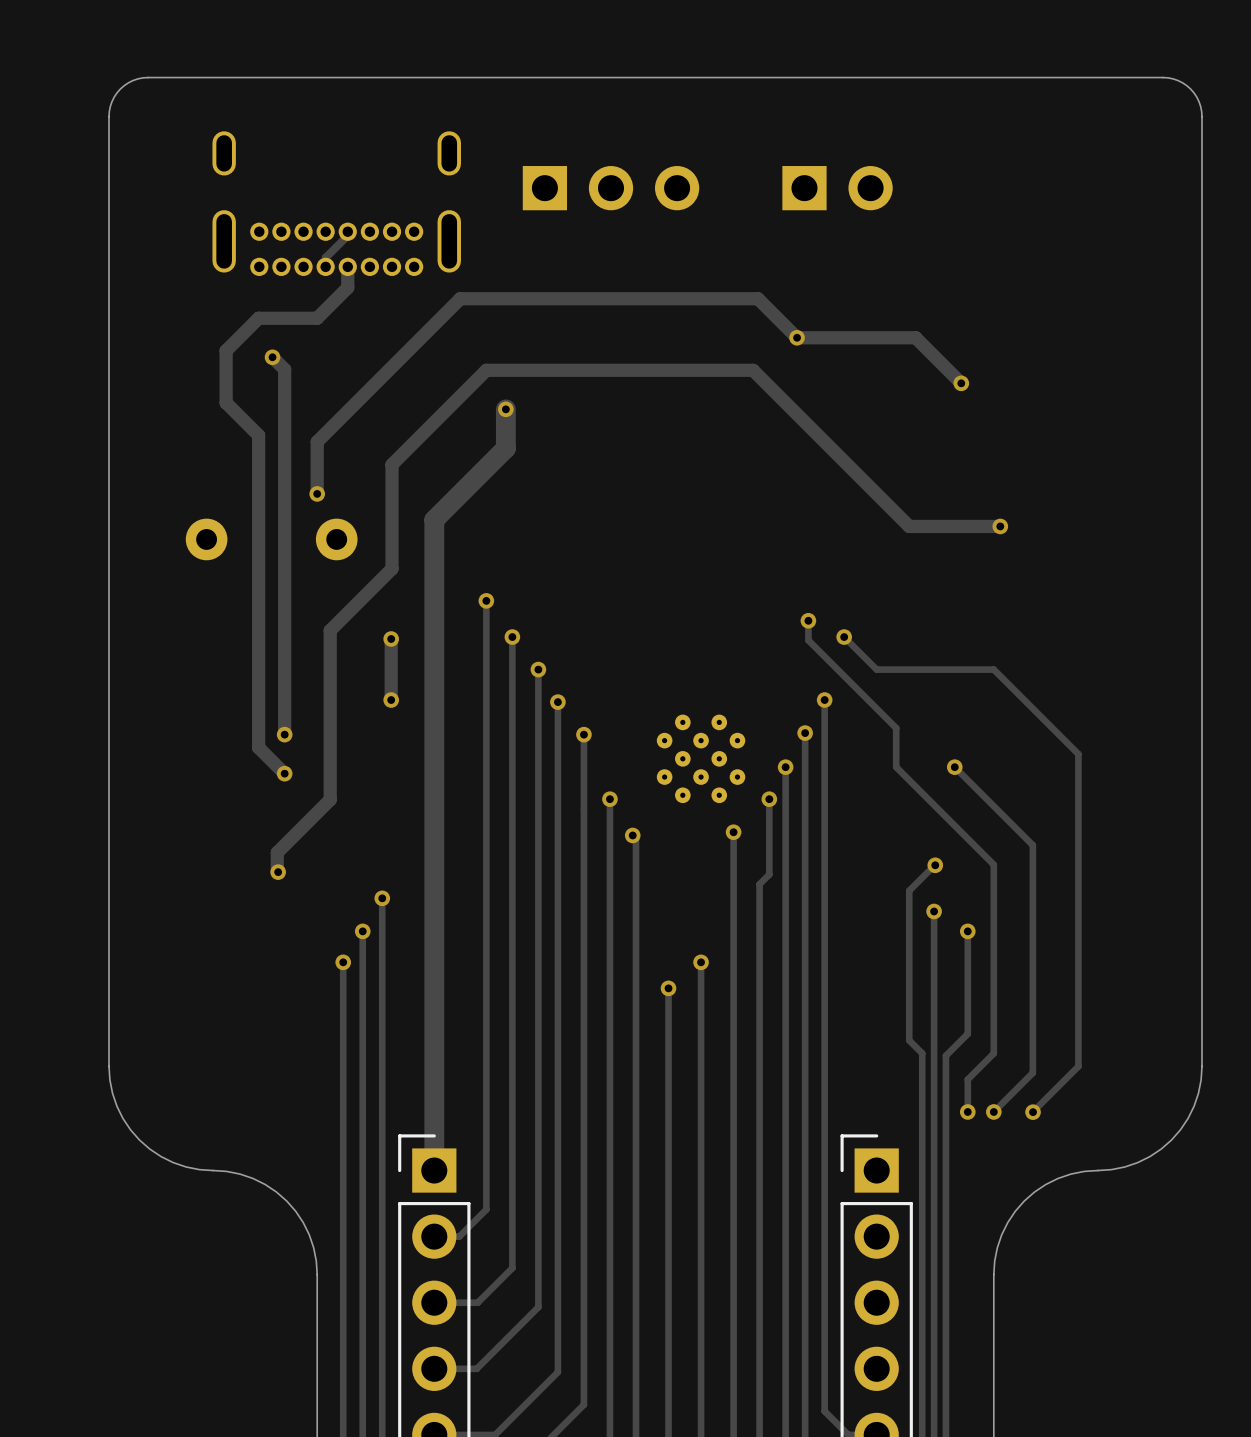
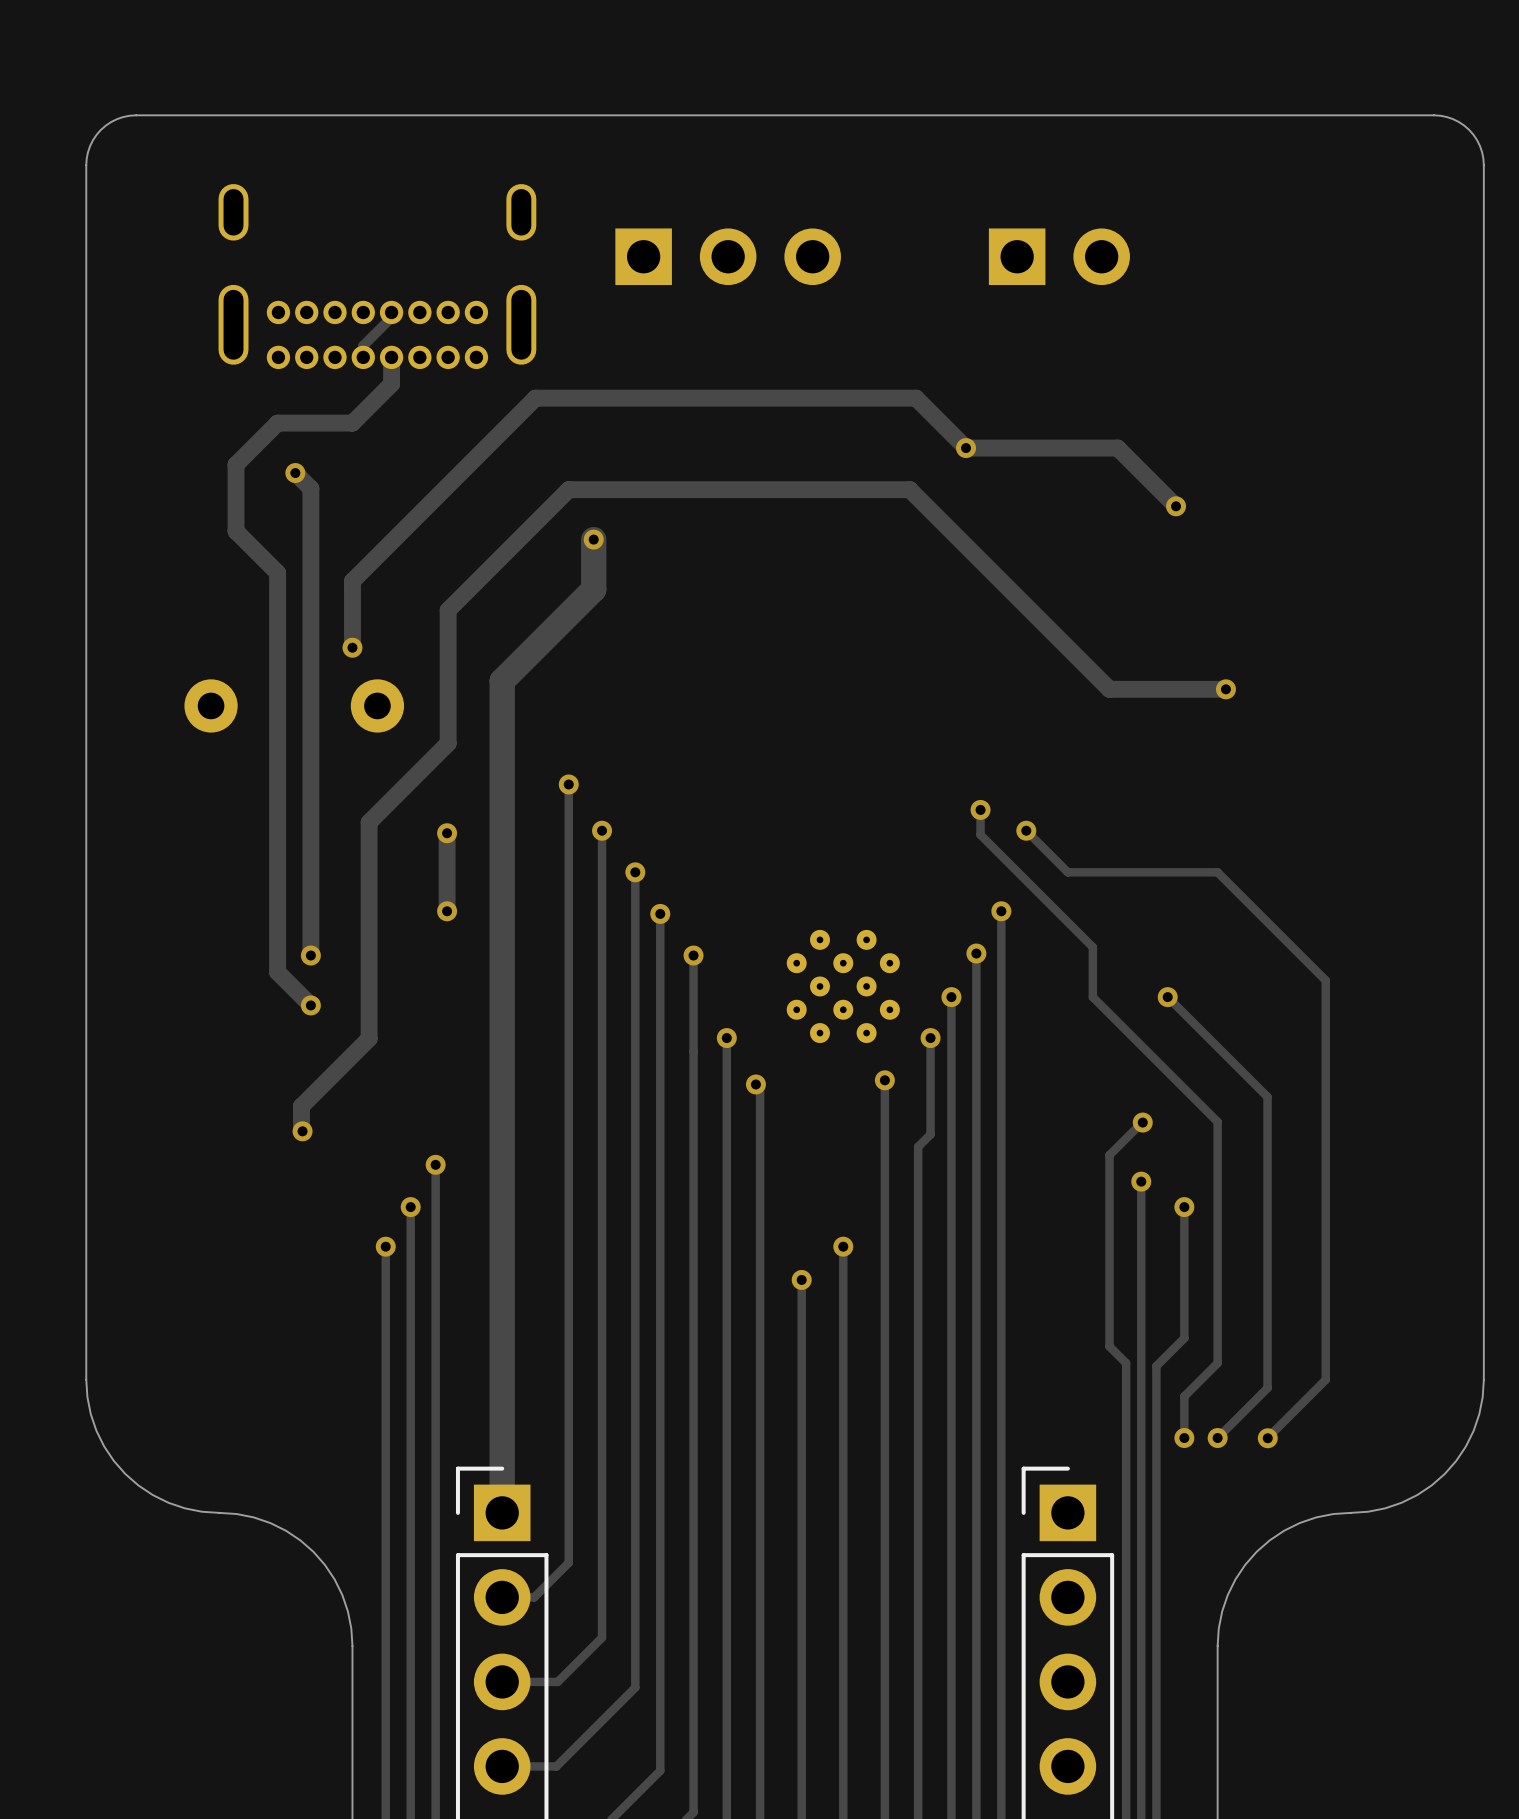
part position: (837, 188) -> (1059, 256)

